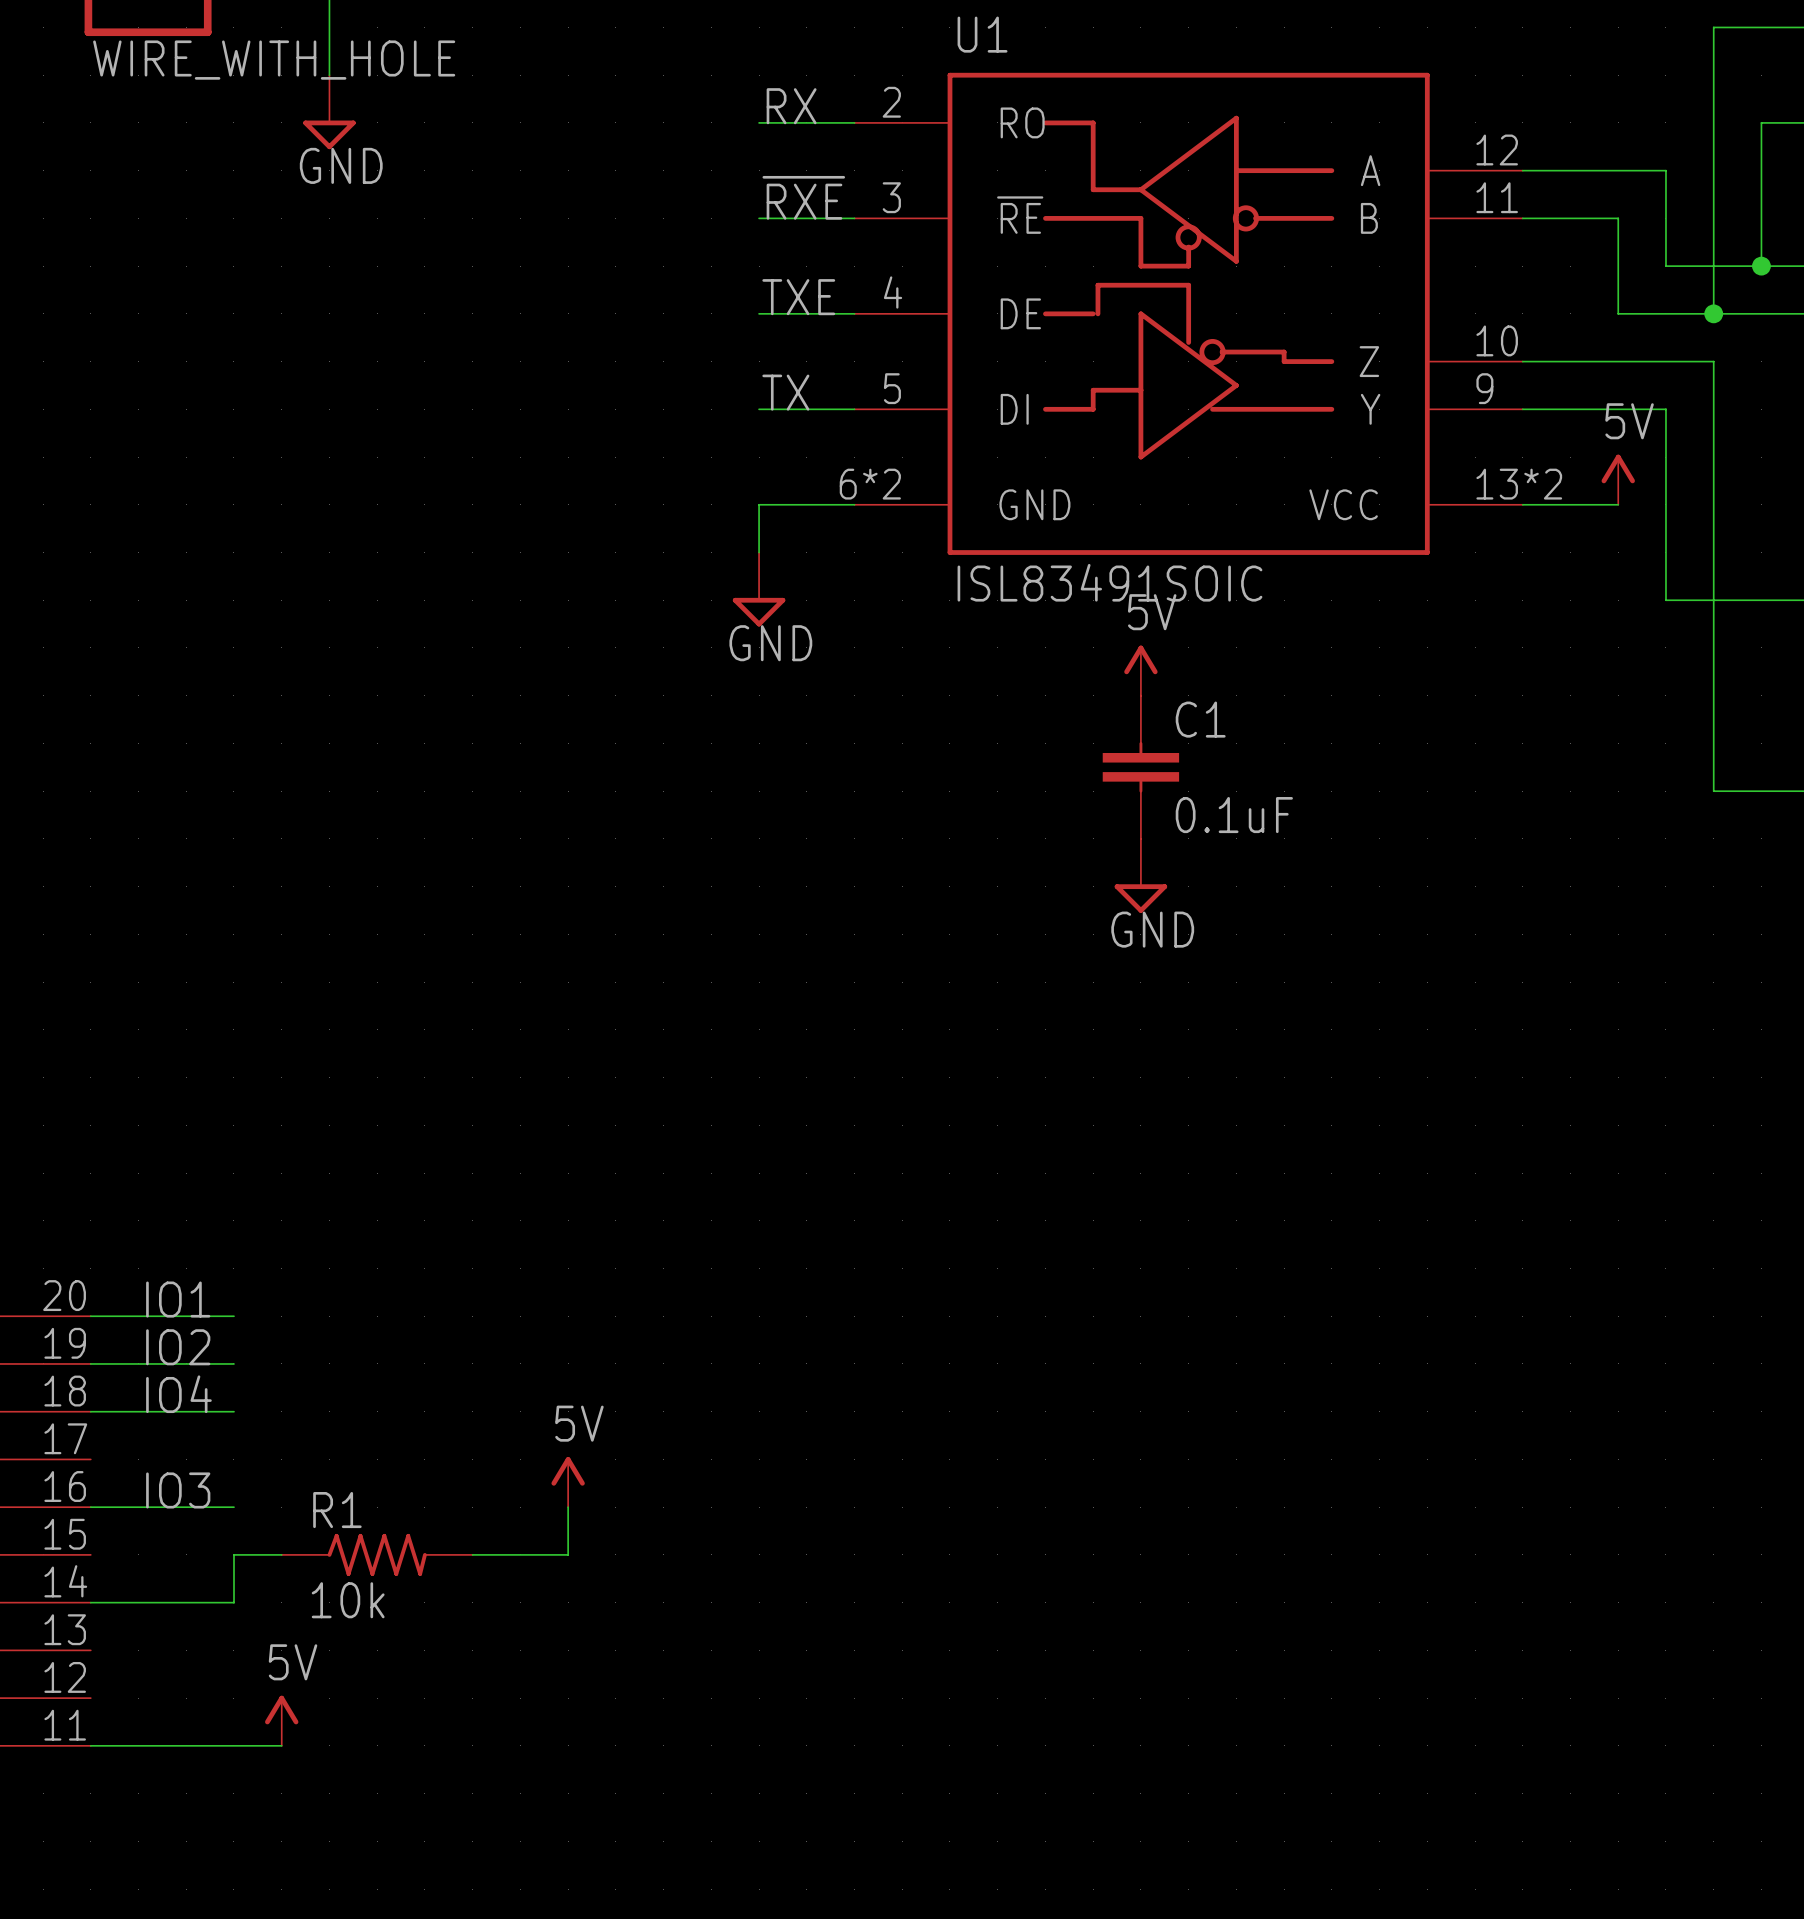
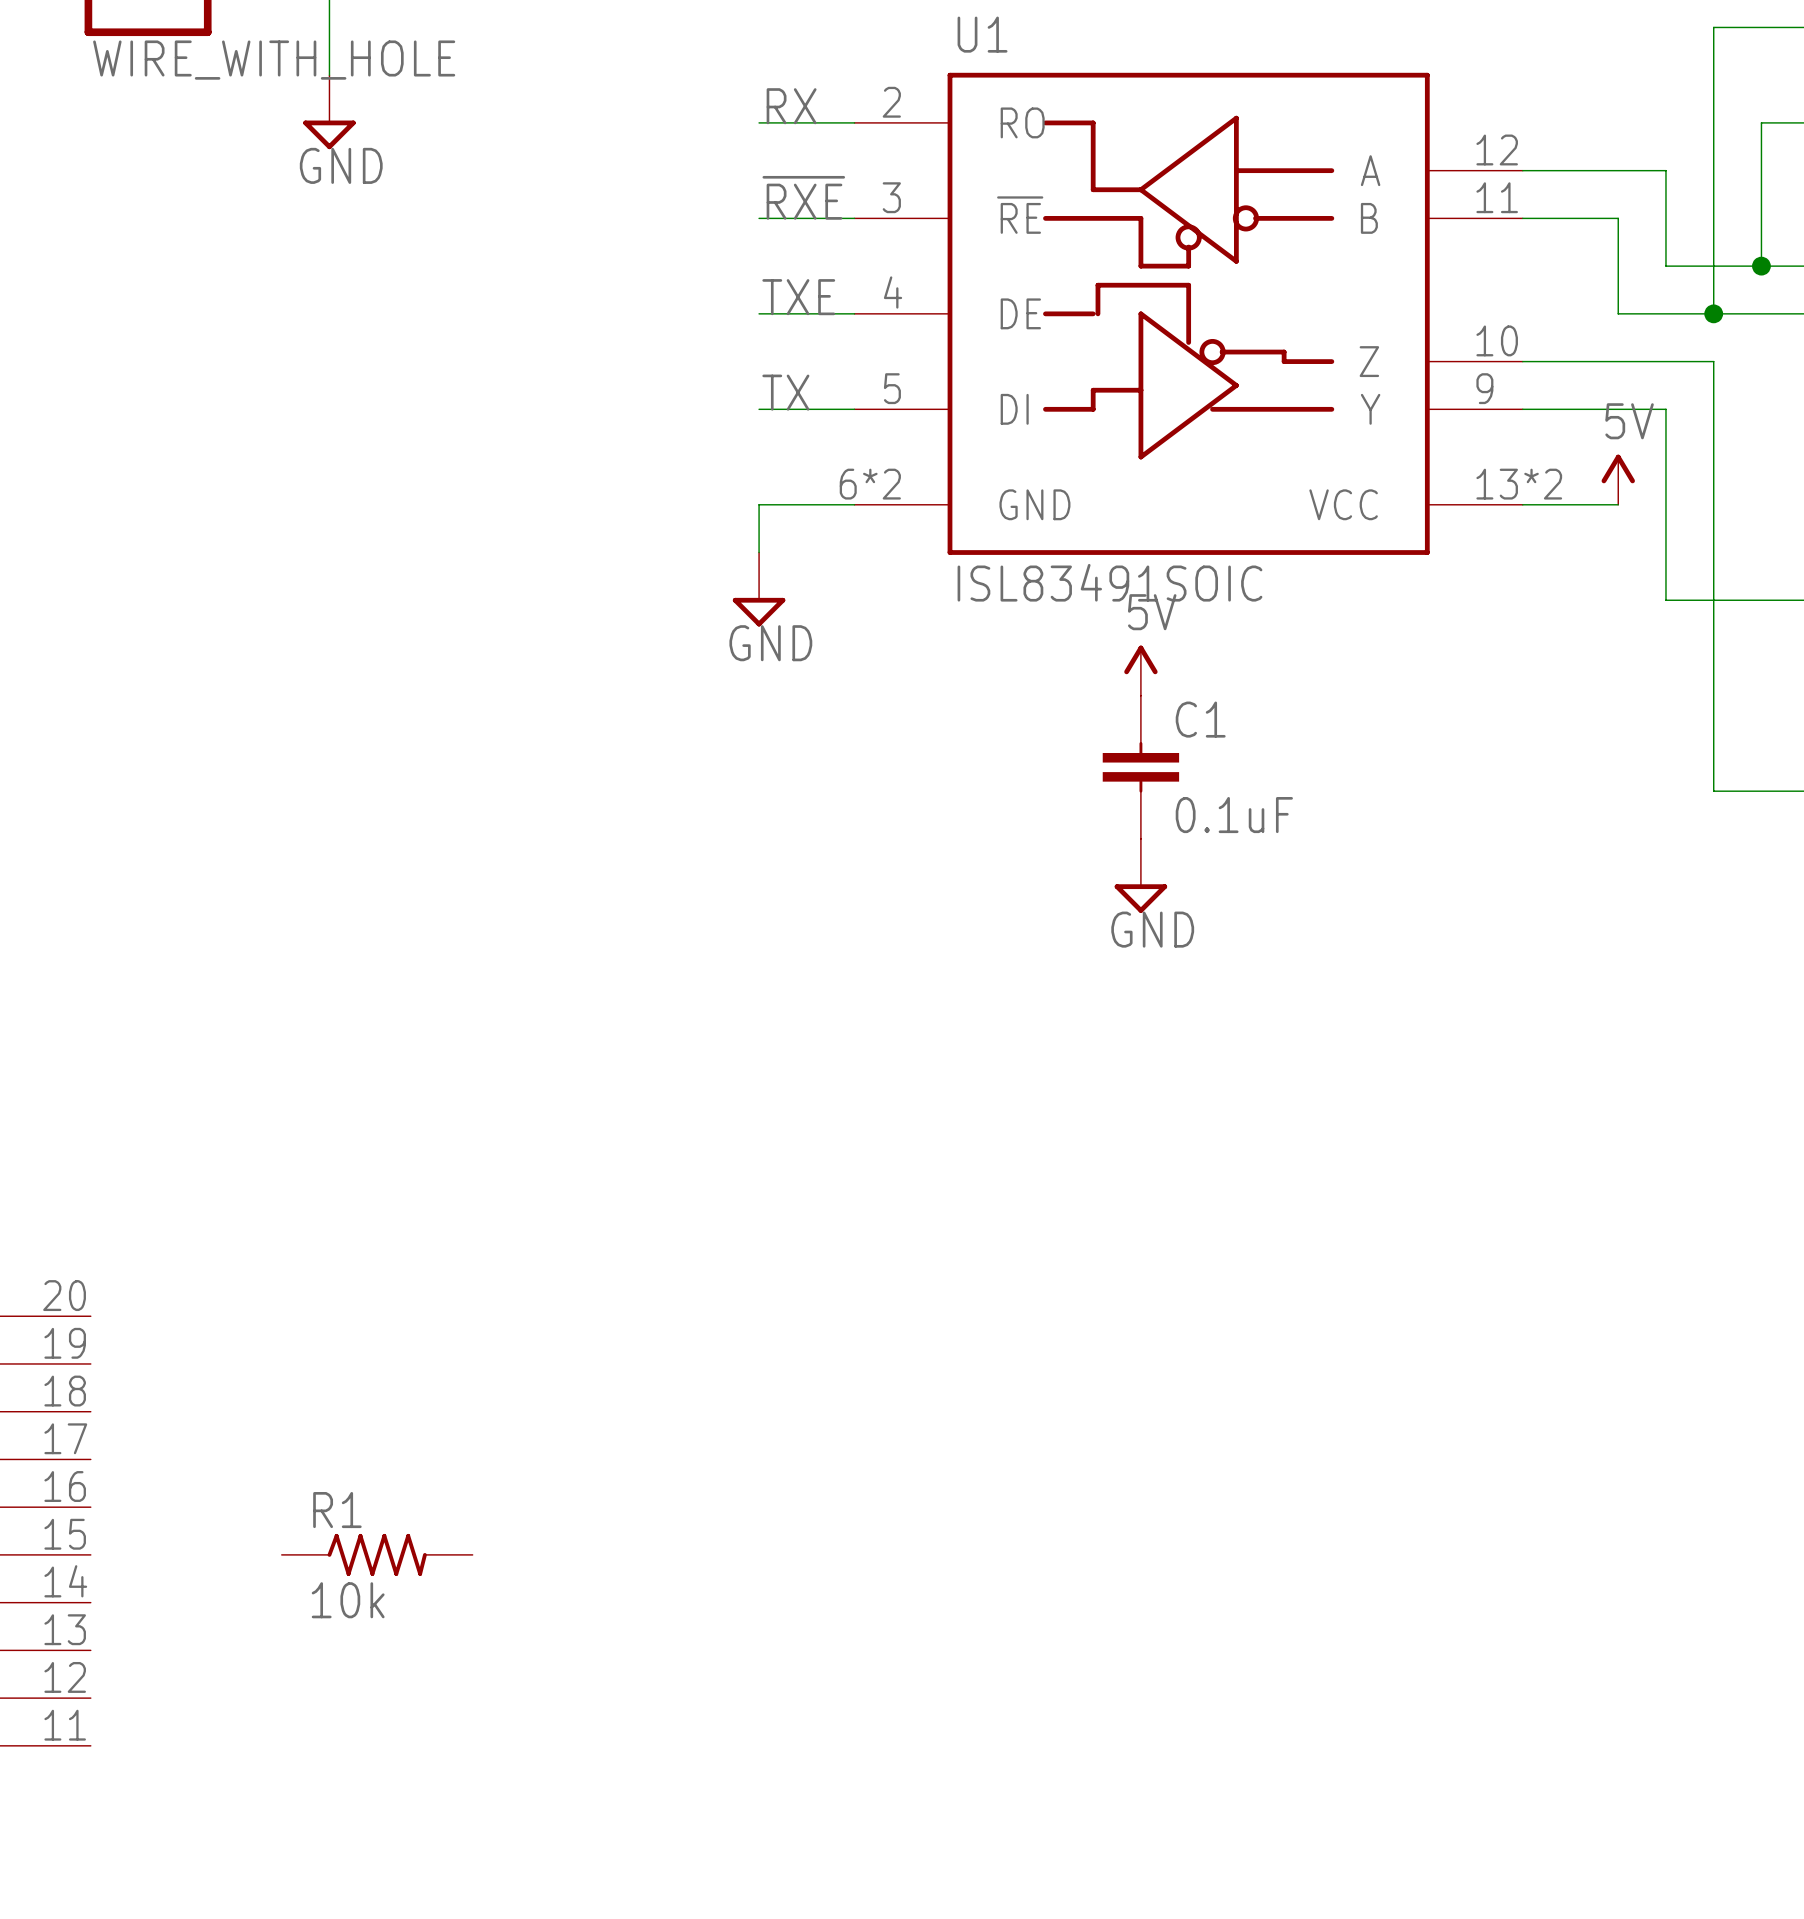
label: IO1 (178, 1299) -> none
wire: (90, 1316) (233, 1316) -> none
label: IO2 (178, 1347) -> none
wire: (90, 1363) (233, 1363) -> none
label: IO4 (178, 1394) -> none
wire: (90, 1411) (233, 1411) -> none
power symbol: 5V (568, 1482) -> none
label: IO3 (178, 1490) -> none
wire: (90, 1507) (233, 1507) -> none
wire: (568, 1507) (568, 1554) (472, 1554) -> none
wire: (281, 1554) (233, 1554) (233, 1602) (90, 1602) -> none
power symbol: 5V (281, 1720) -> none
wire: (90, 1745) (281, 1745) -> none

